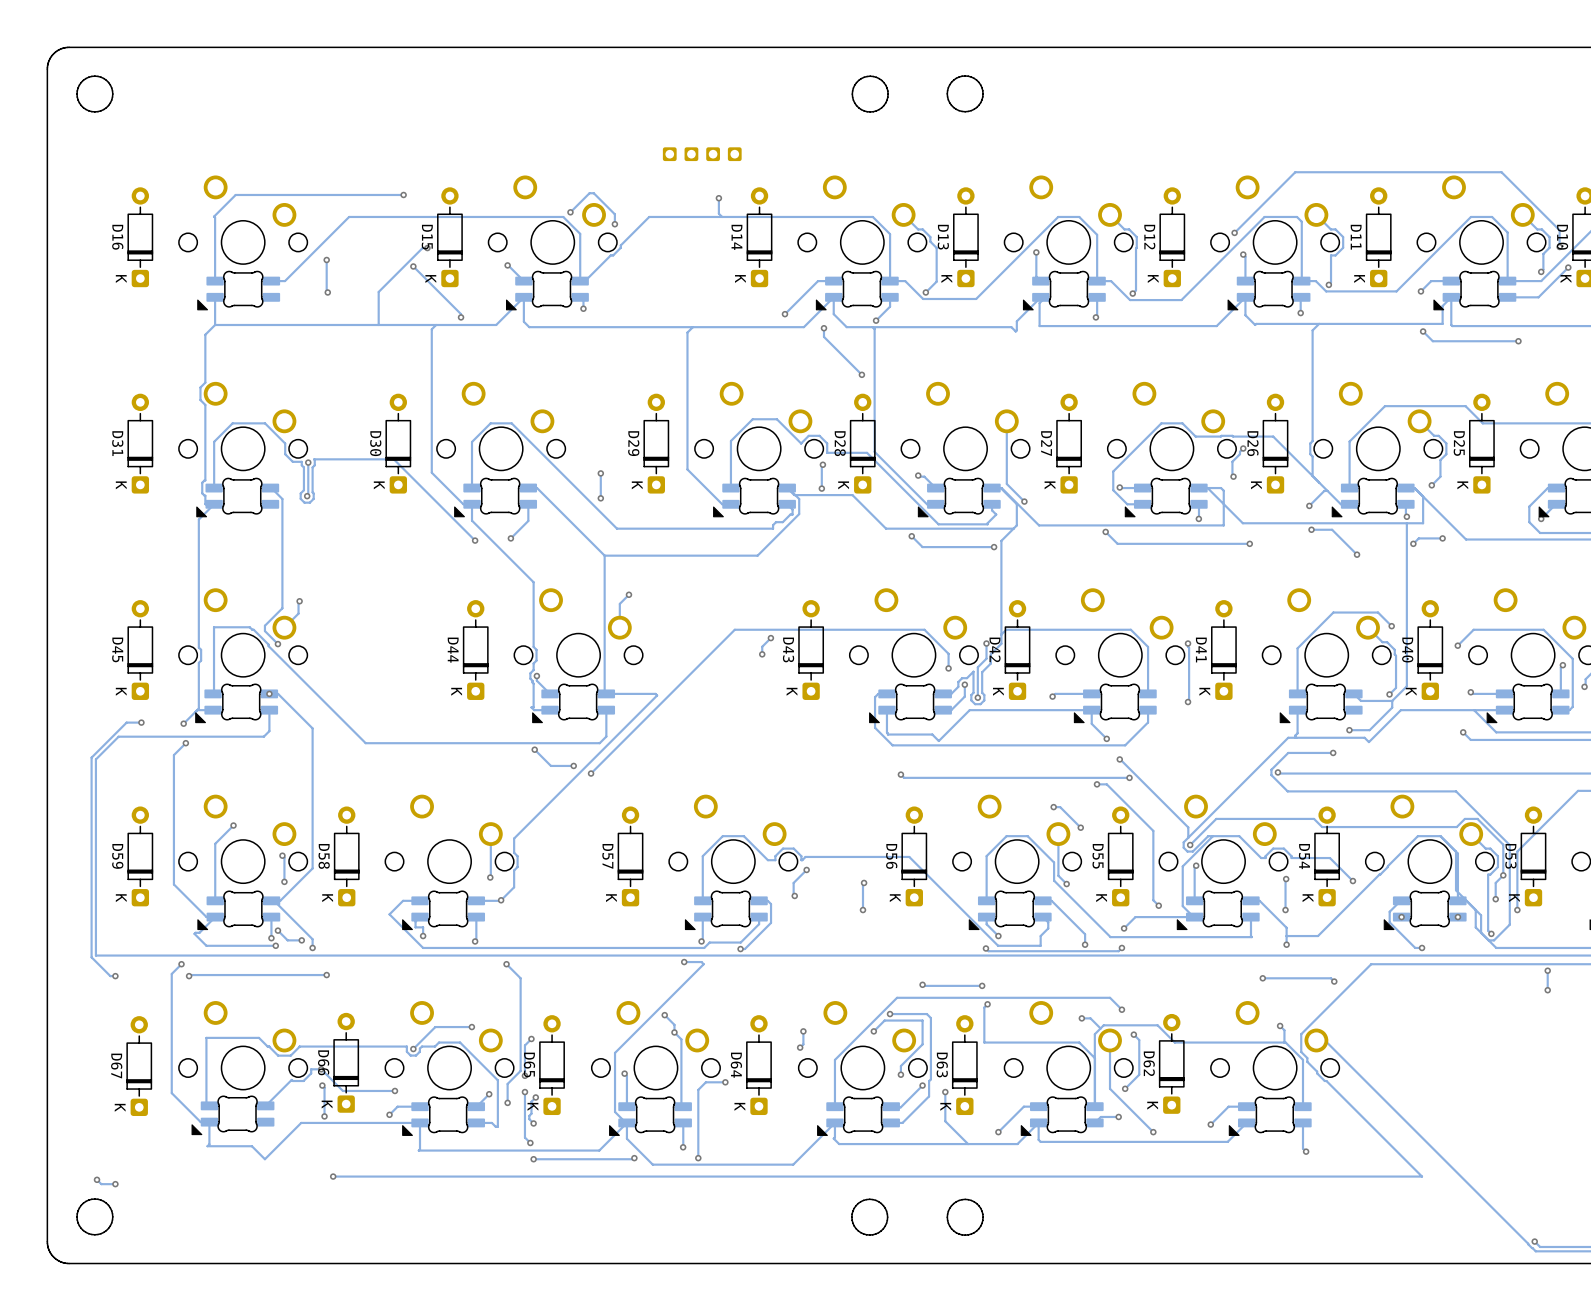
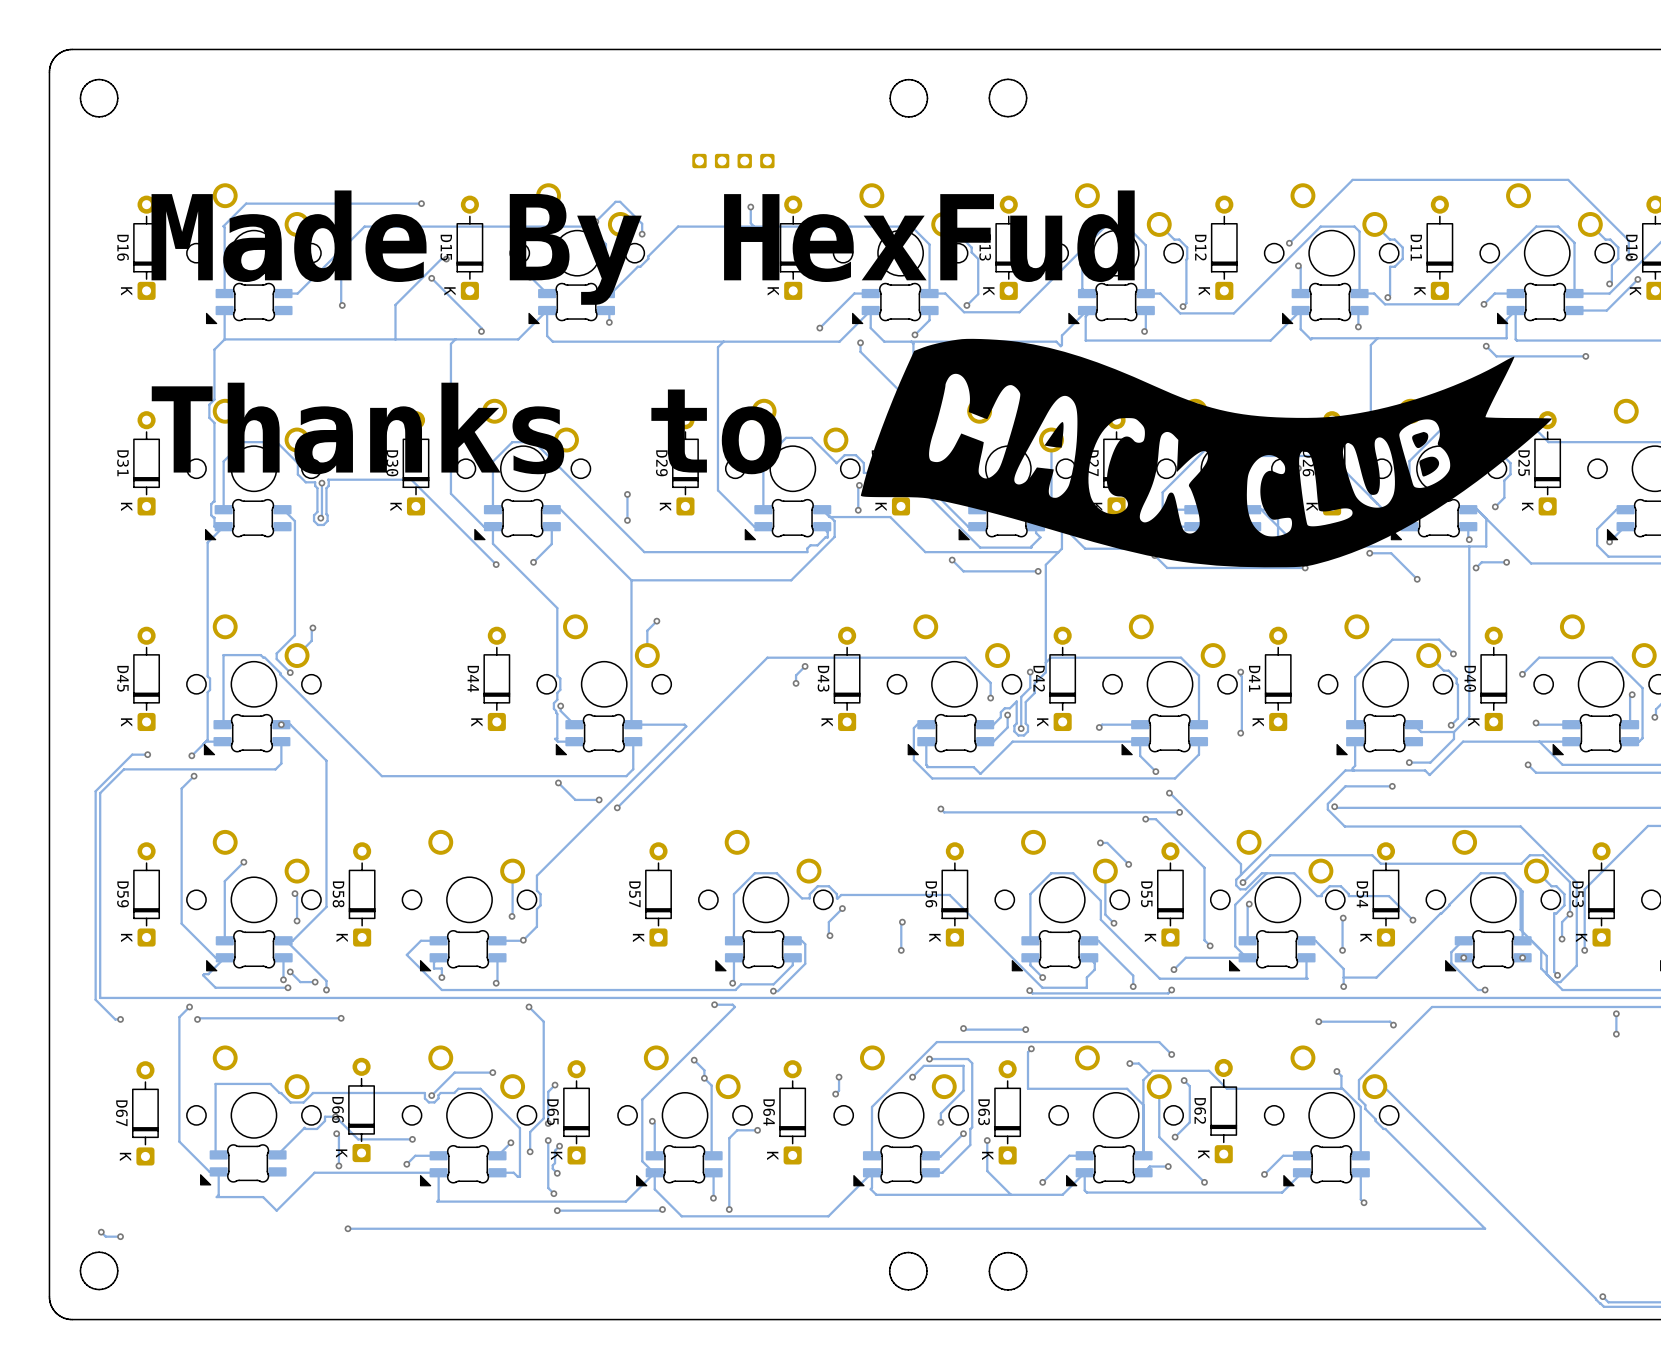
text: none -> Made By HexFud (643, 247)
drawing: none -> [860, 338, 1552, 568]
text: none -> Thanks to (466, 428)

